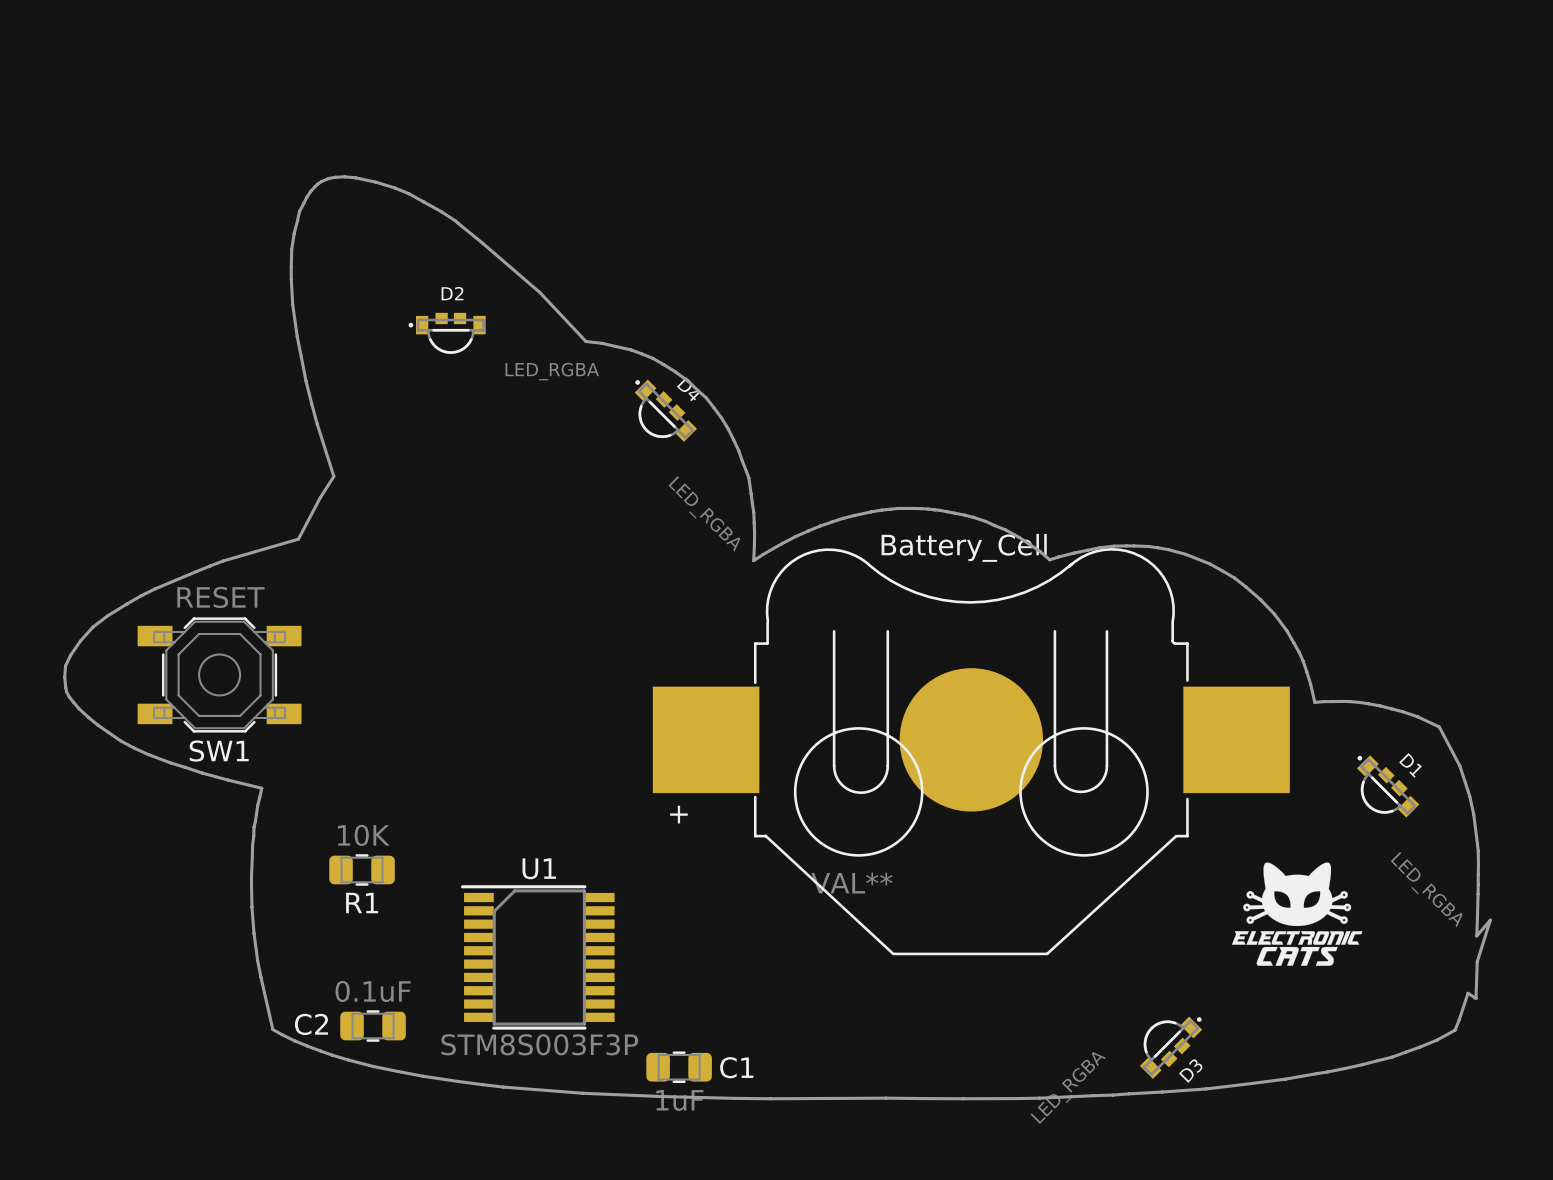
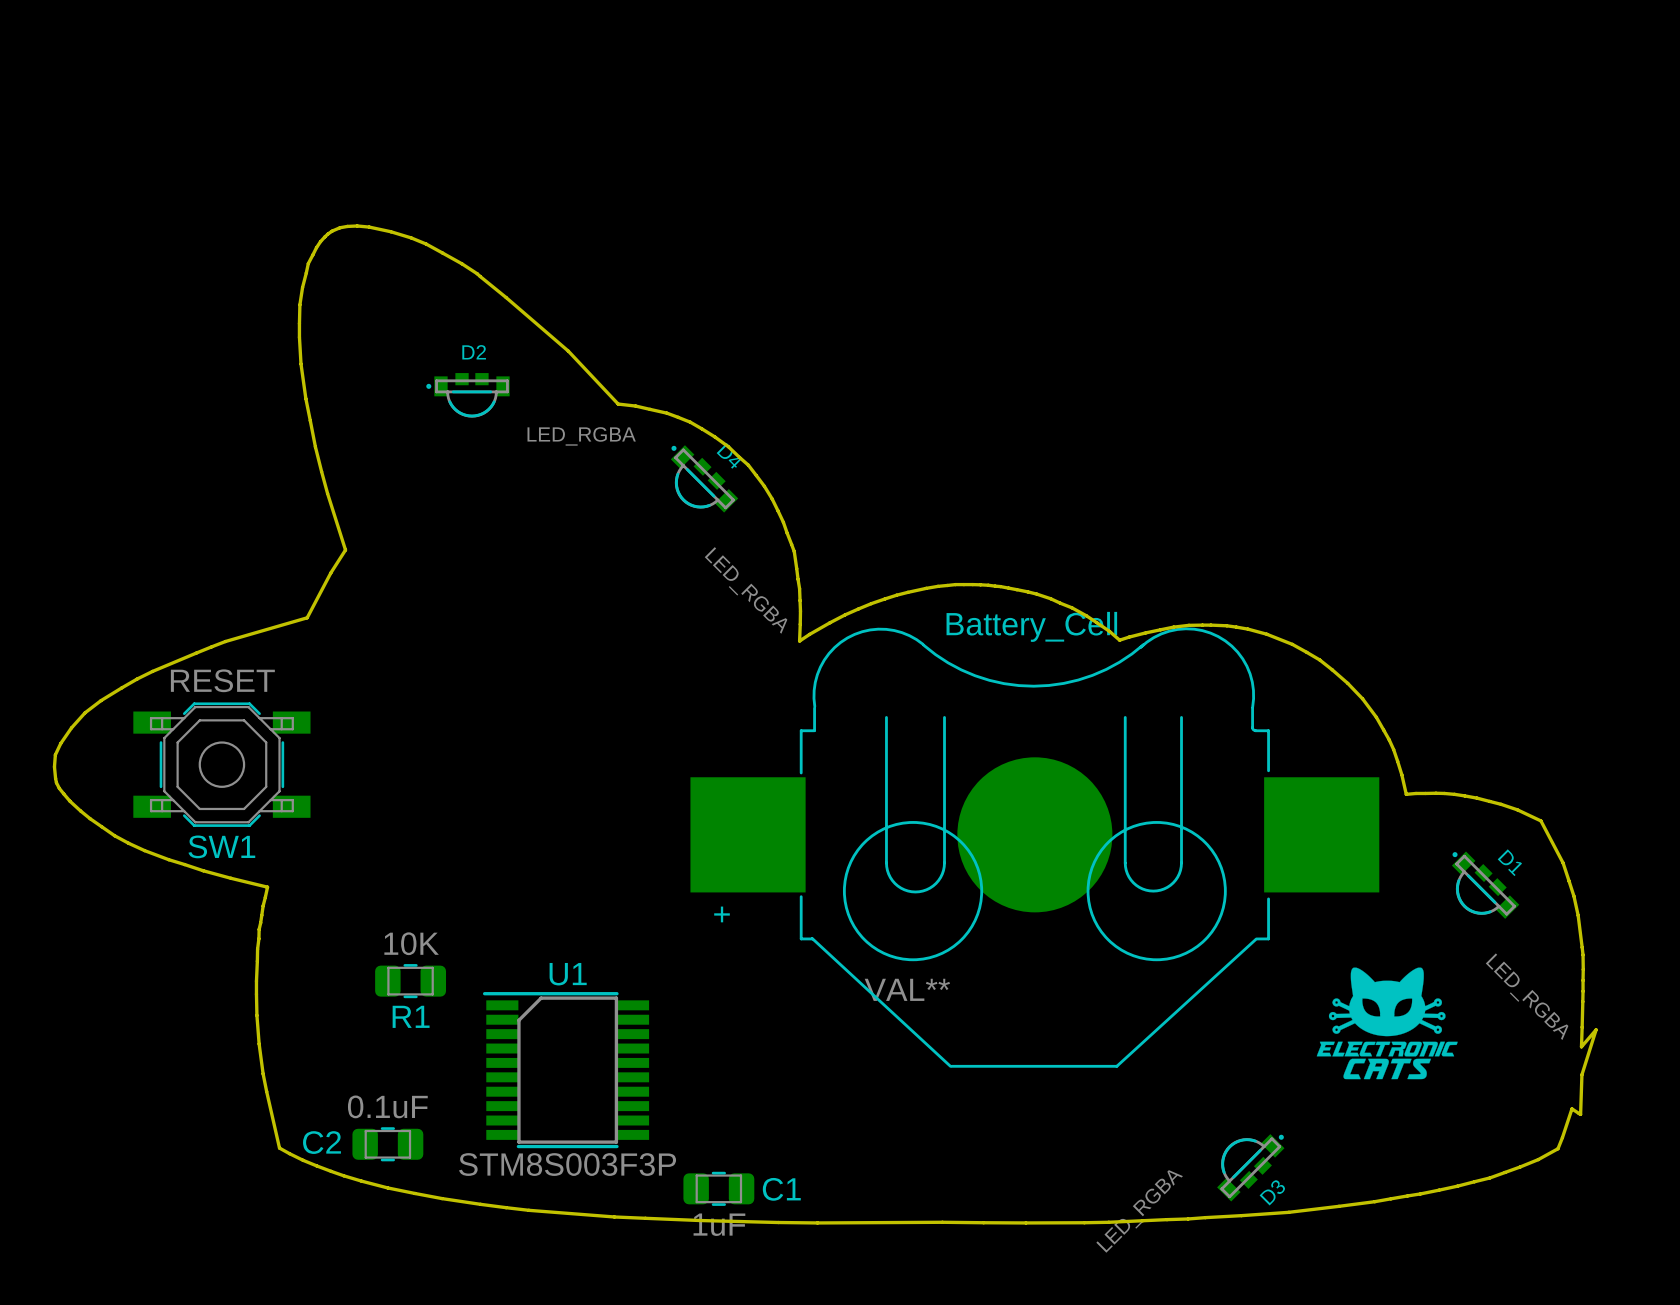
R1 position: (362, 869) -> (410, 981)

